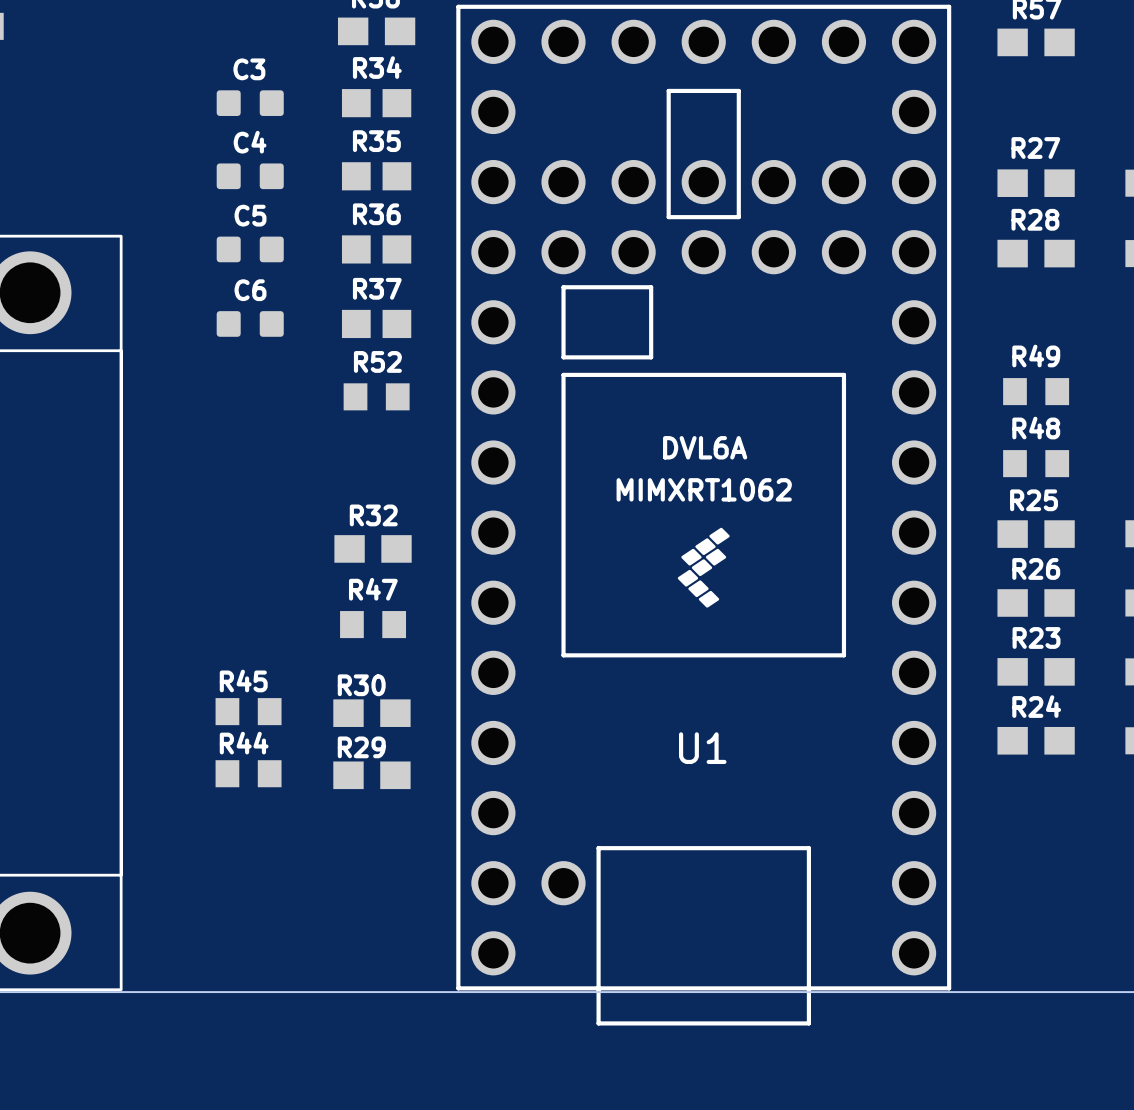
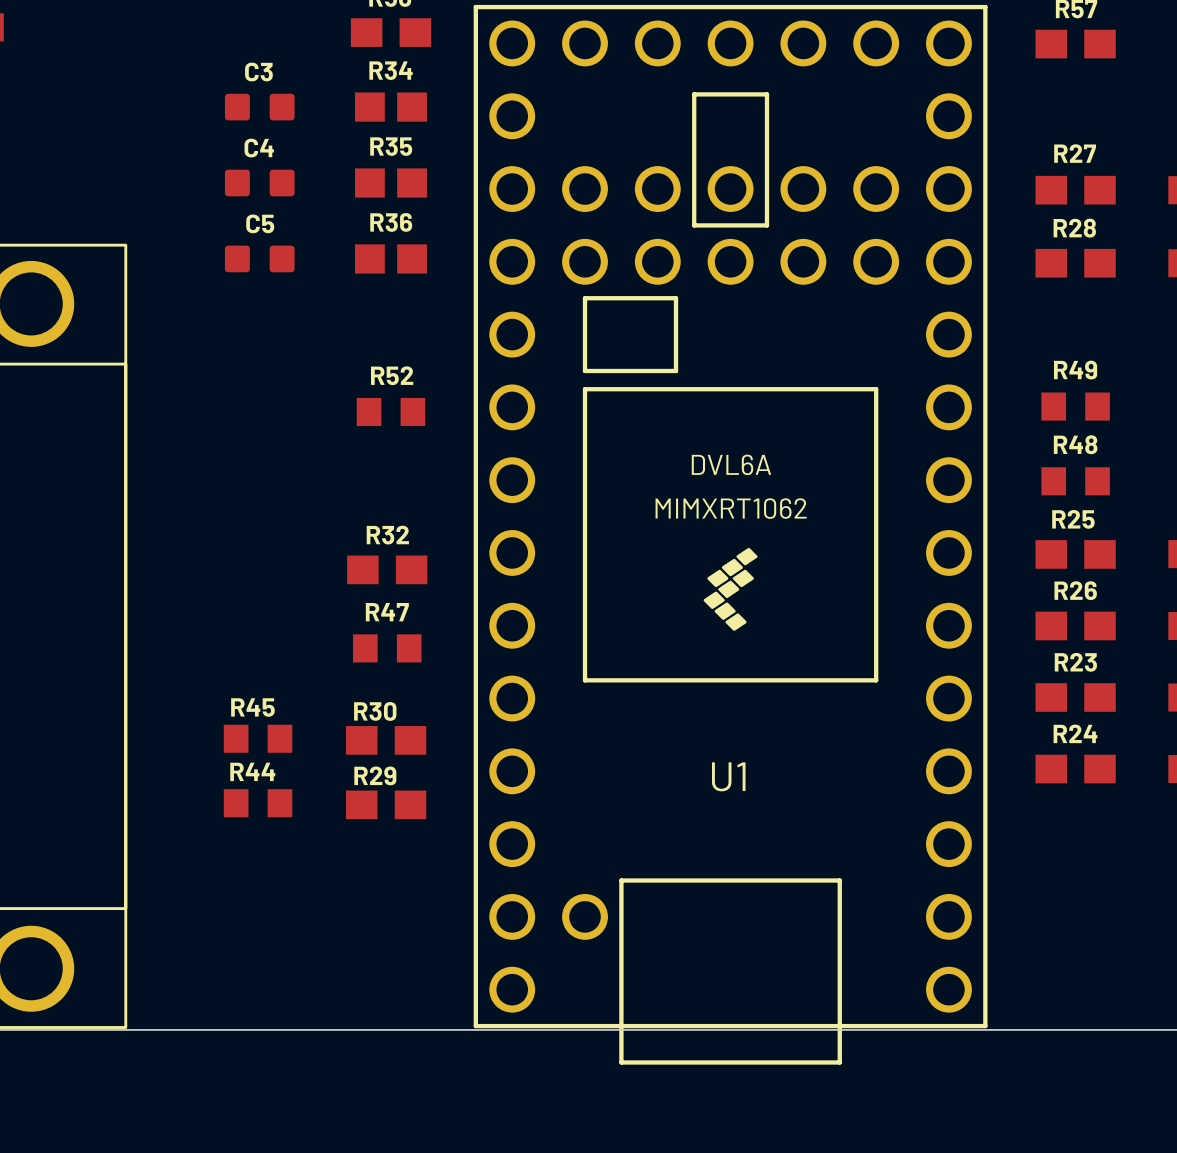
C6: (250, 323) -> none
R37: (376, 323) -> none

